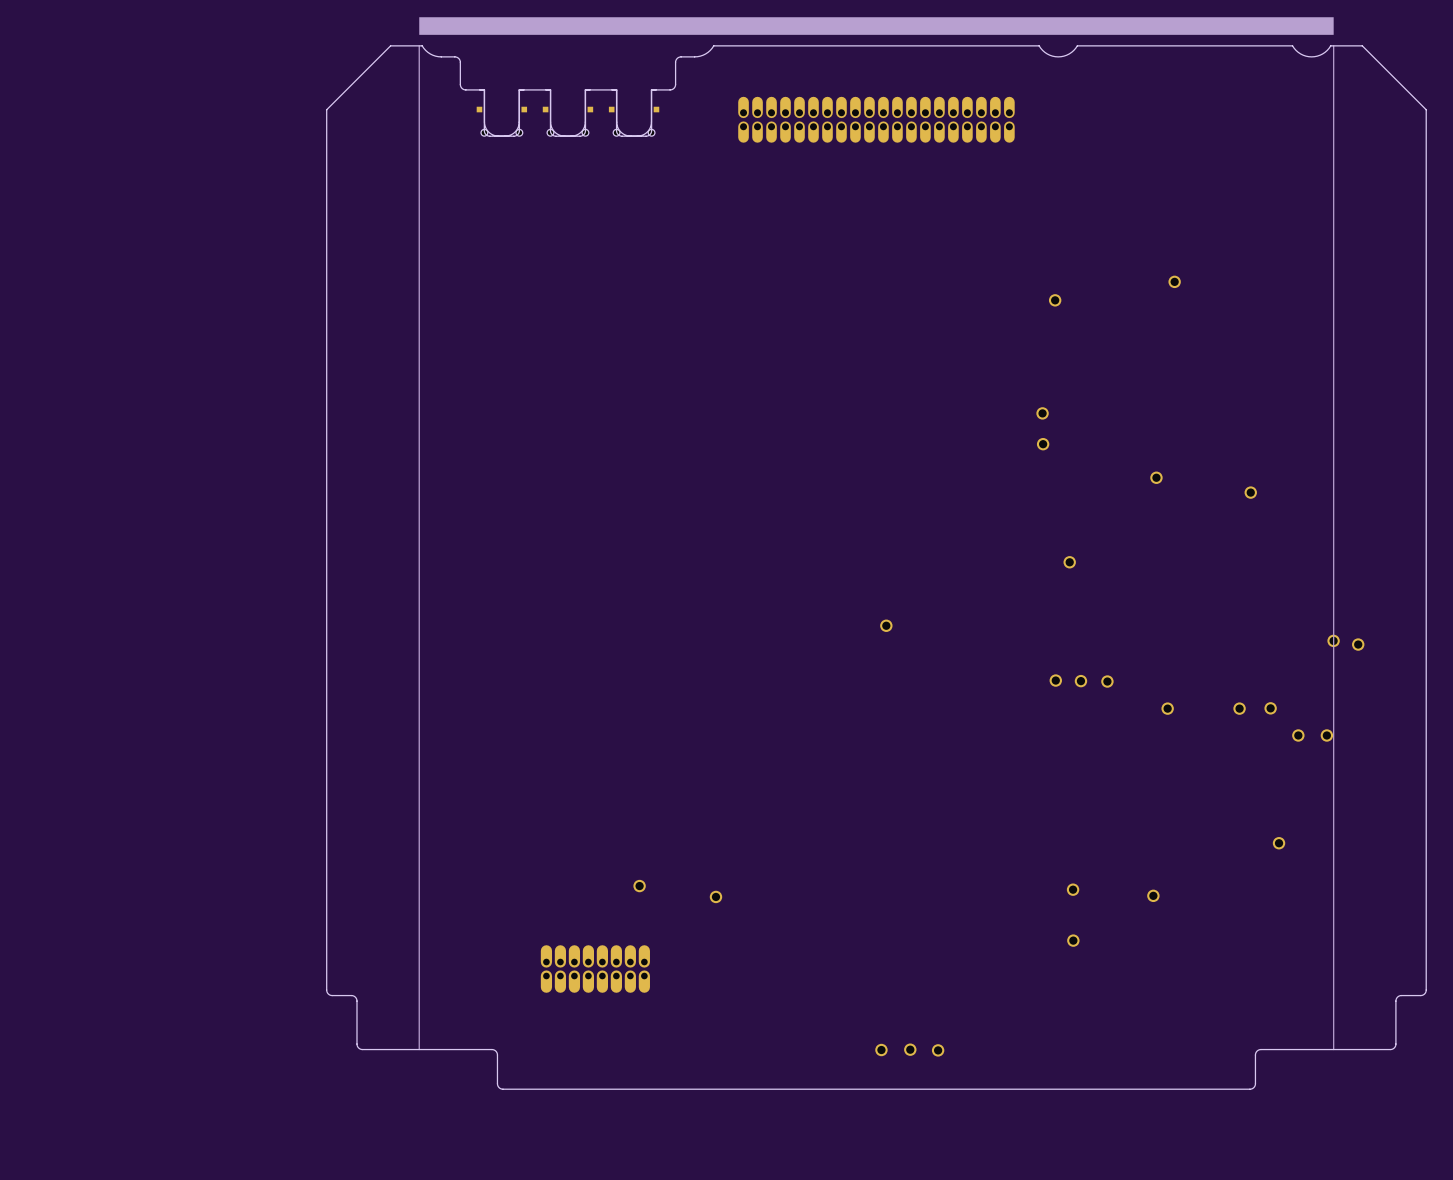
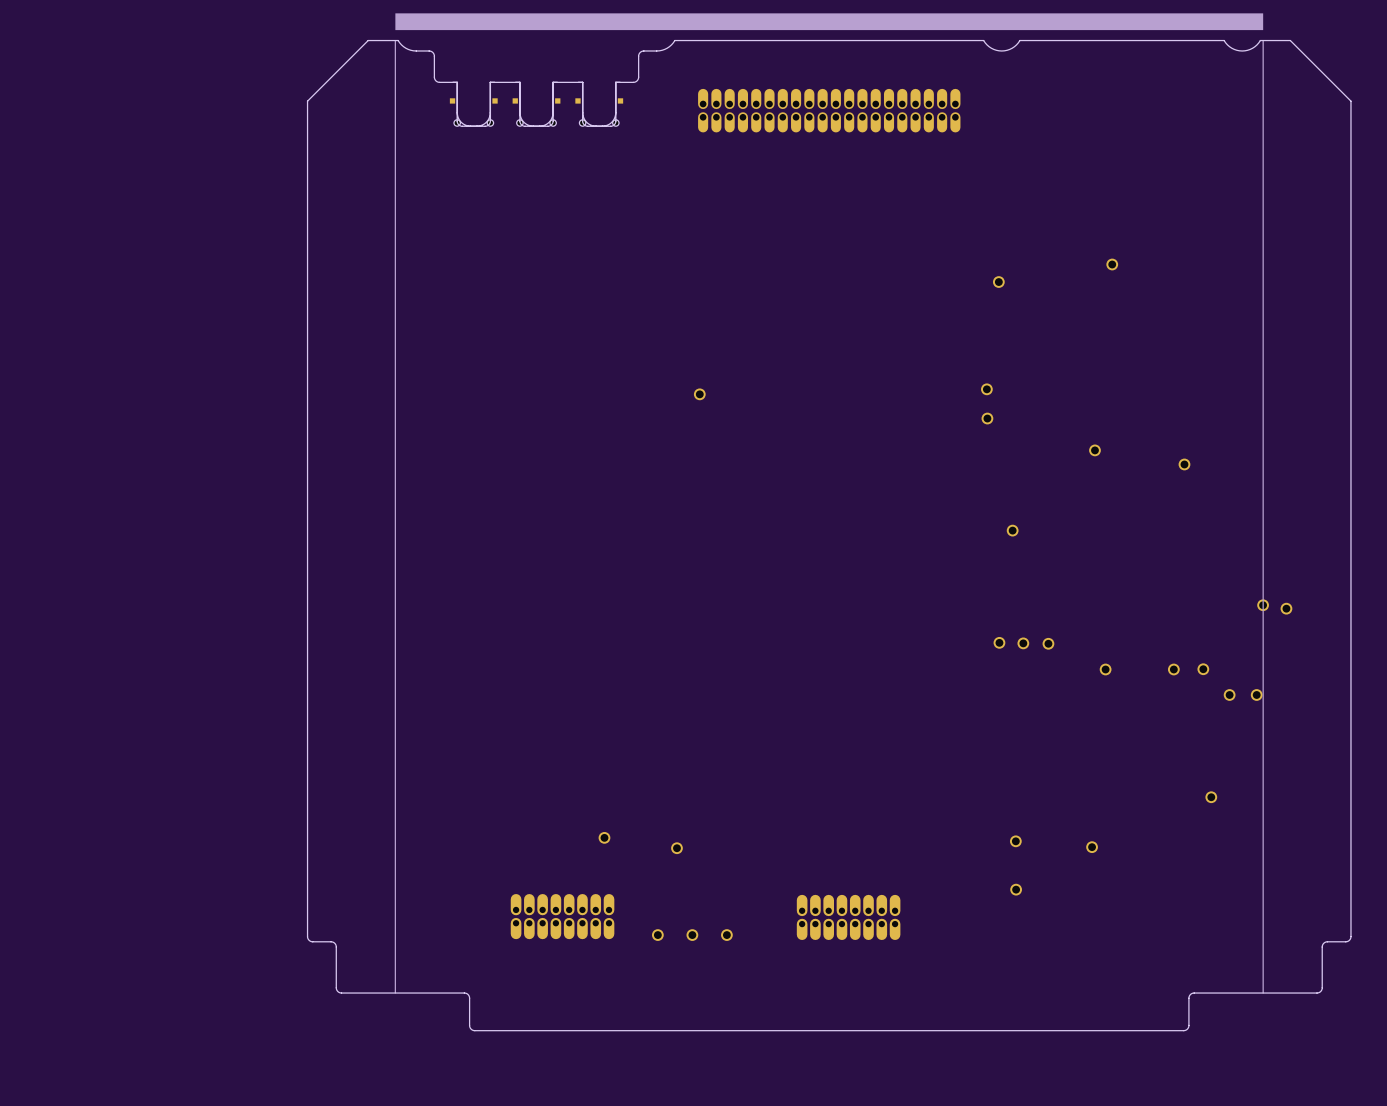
part: none -> (699, 394)
part: (886, 625) -> none
part: none -> (848, 917)
part: none -> (657, 935)
part: none -> (692, 935)
part: none -> (726, 935)
part: (910, 1049) -> none
part: (881, 1050) -> none
part: (938, 1050) -> none

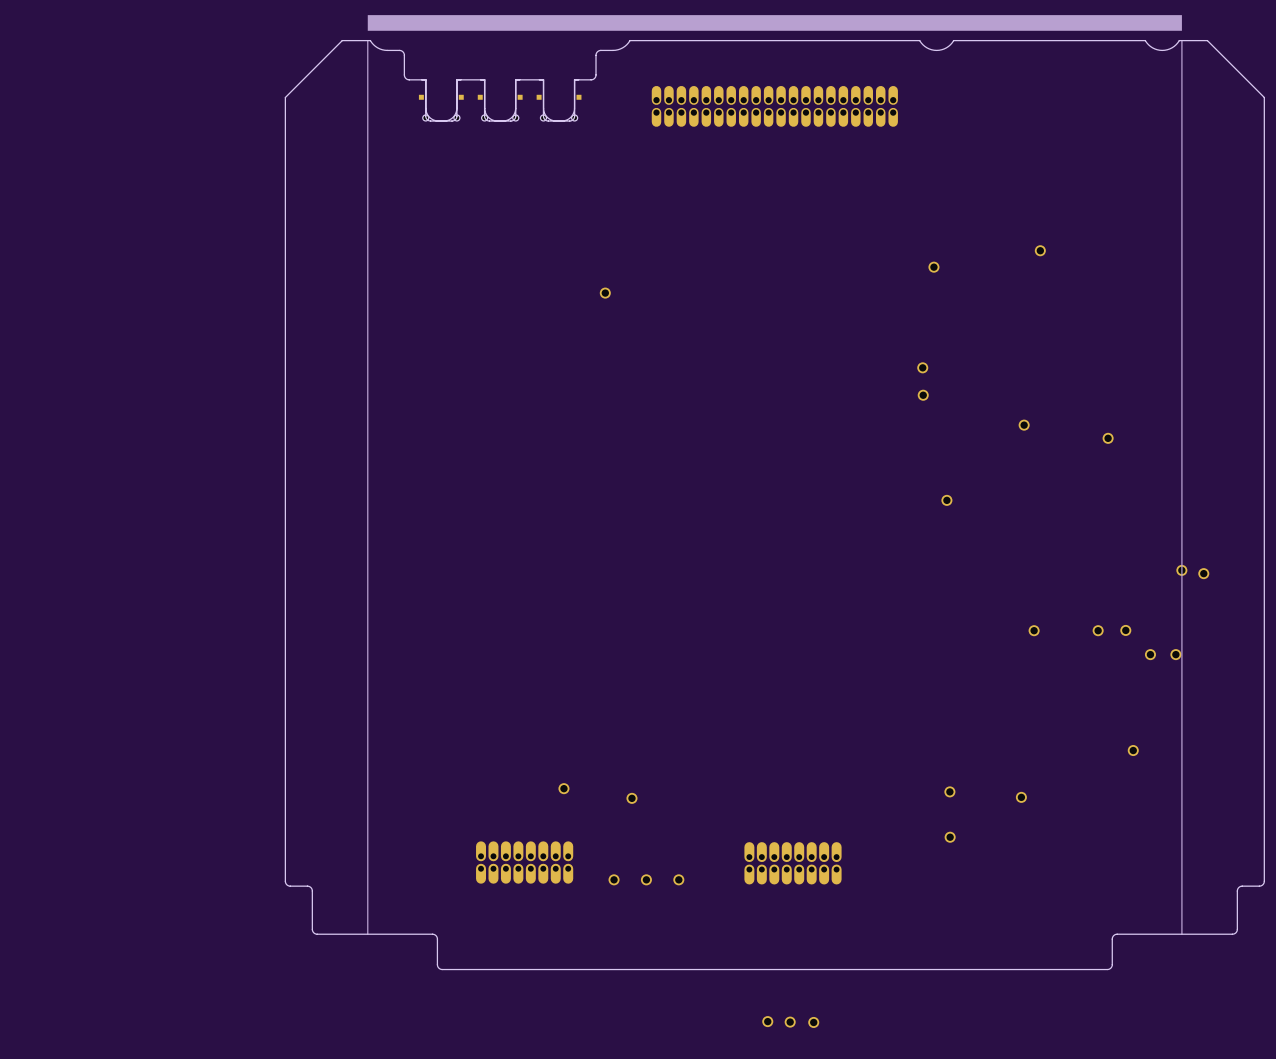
part position: (699, 394) -> (605, 293)
part: (999, 642) -> none
part: (1023, 643) -> none
part: (1048, 643) -> none
part: none -> (767, 1021)
part: none -> (790, 1022)
part: none -> (813, 1022)

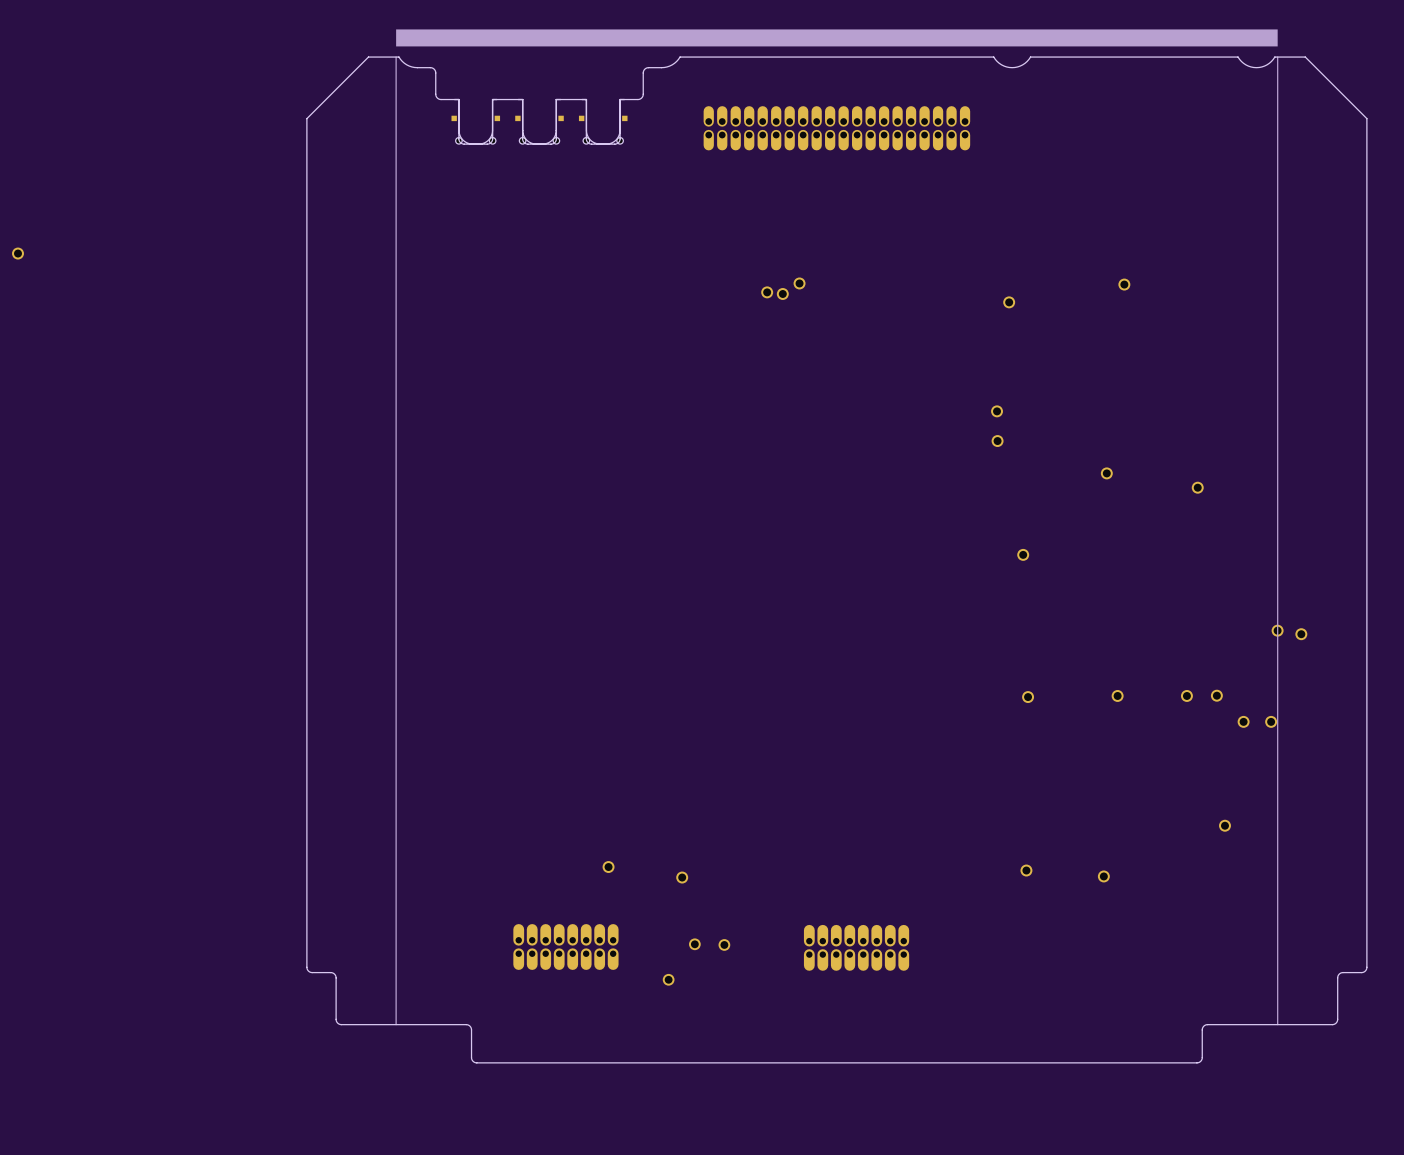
part: none -> (18, 253)
part: none -> (799, 283)
part: none -> (767, 292)
part: none -> (782, 293)
part: (605, 293) -> none
part: none -> (1028, 697)
part: (950, 837) -> none
part: none -> (694, 944)
part: none -> (724, 944)
part: (614, 879) -> none
part: (646, 879) -> none
part: (678, 879) -> none
part: none -> (668, 979)
part: (767, 1021) -> none
part: (790, 1022) -> none
part: (813, 1022) -> none

